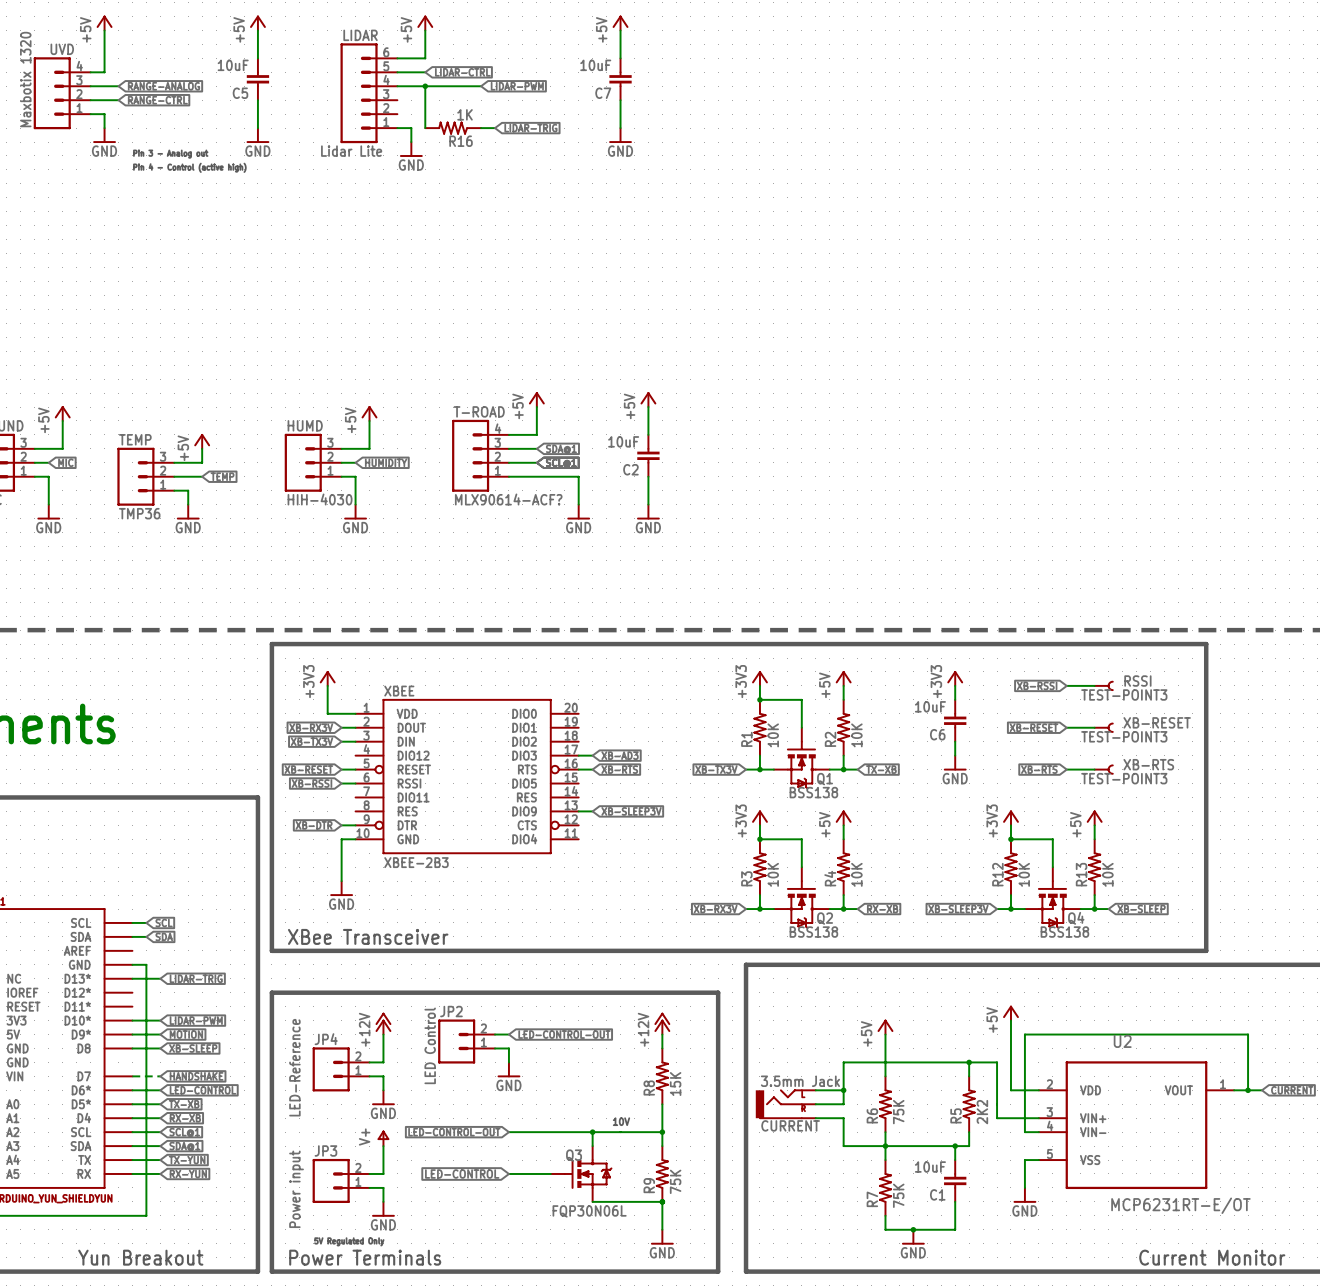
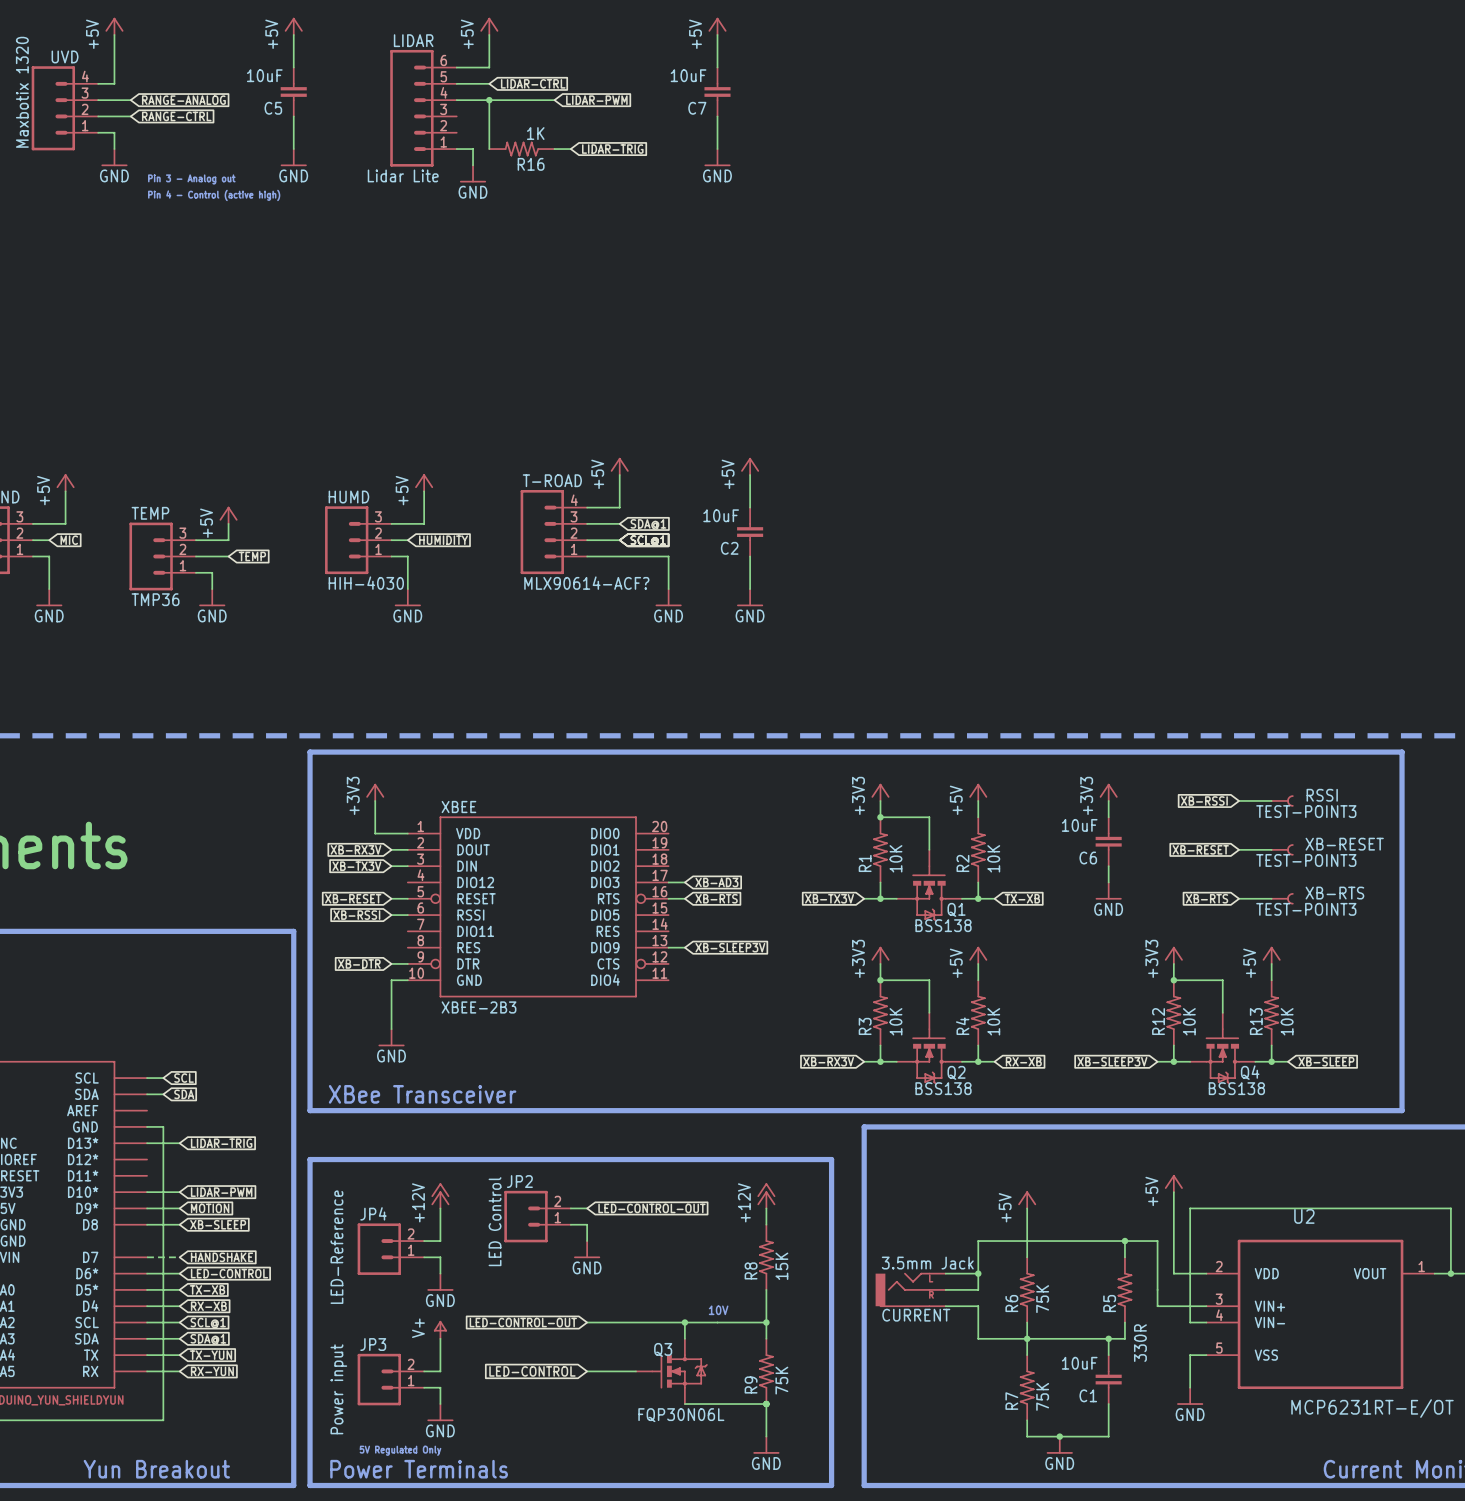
R5 value: 2K2 (982, 1112) -> 330R (1140, 1343)

